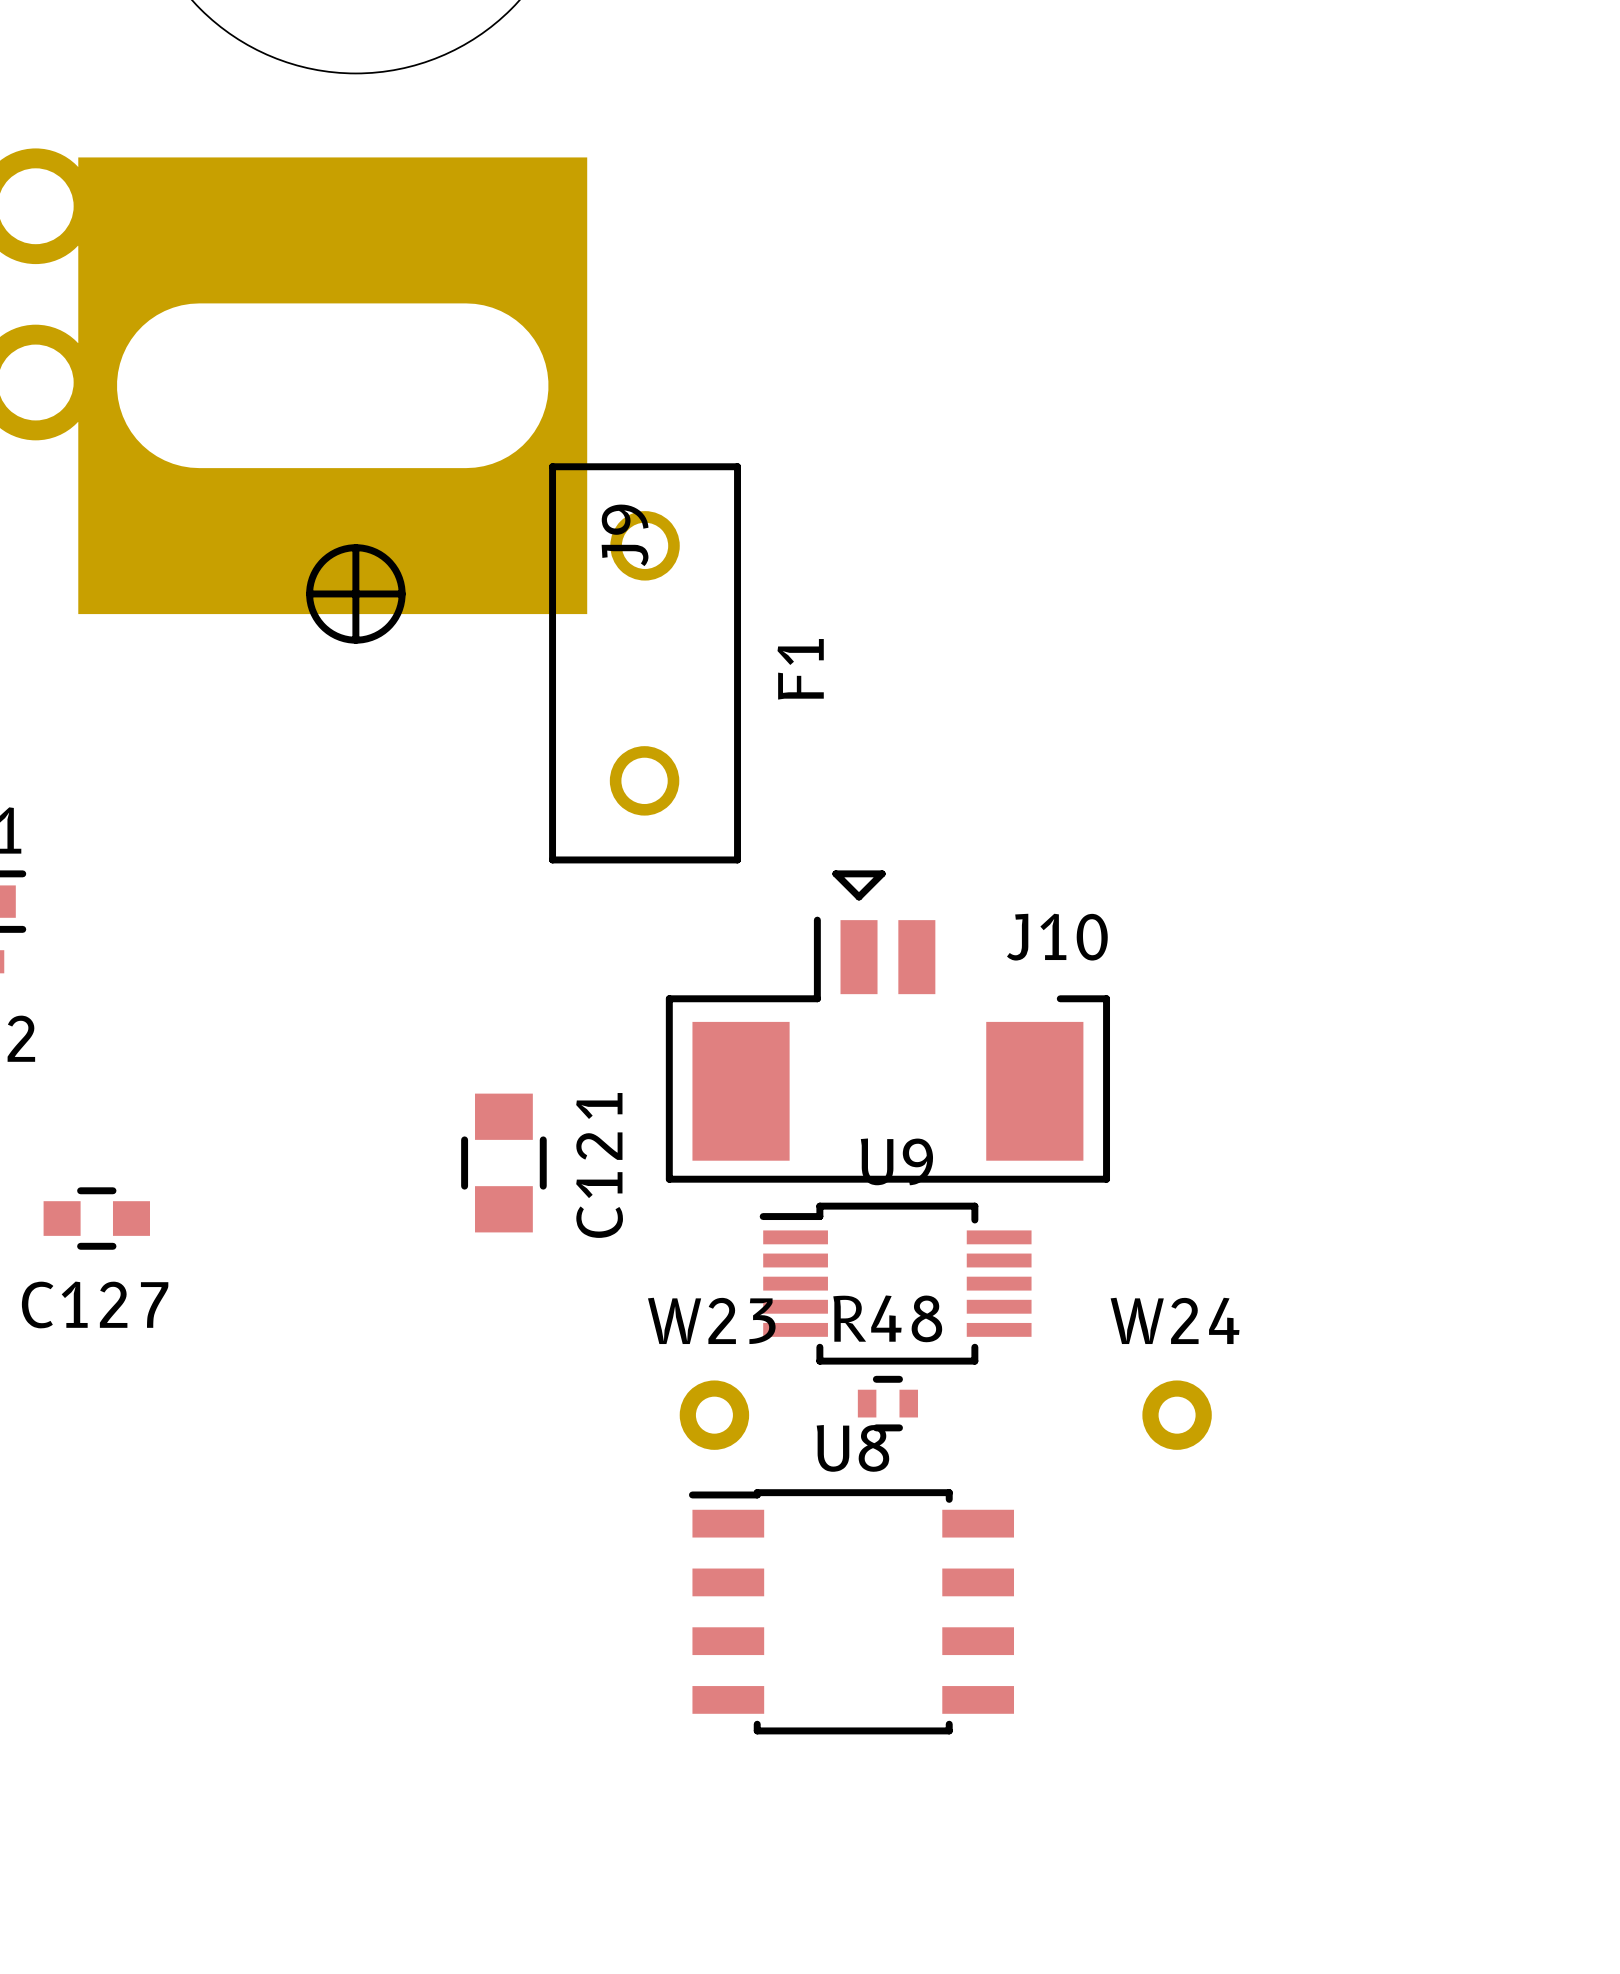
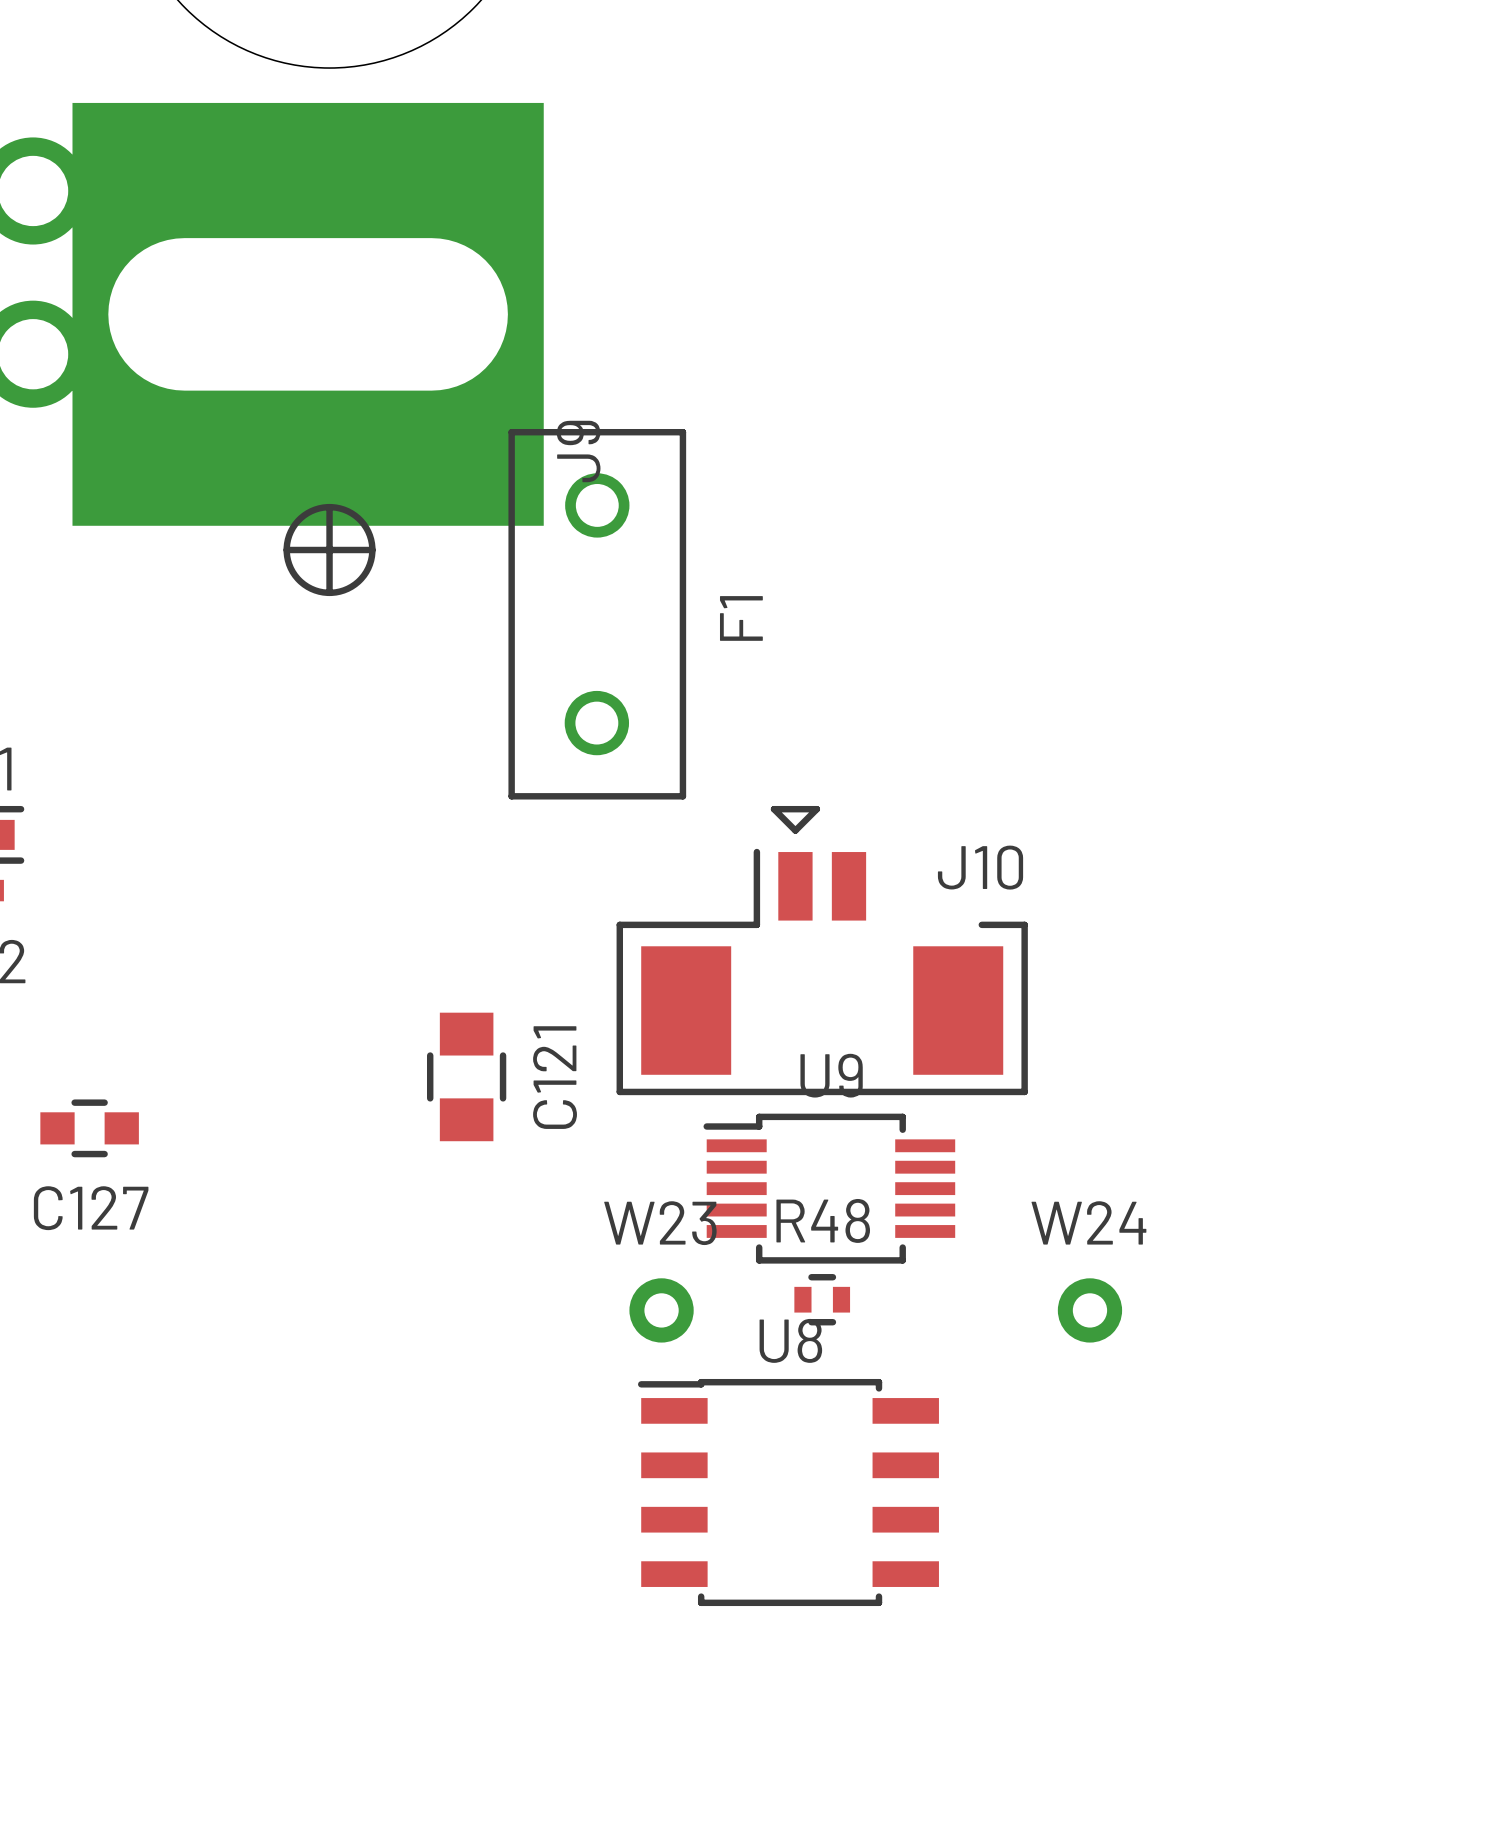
J9 position: (332, 385) -> (308, 314)

